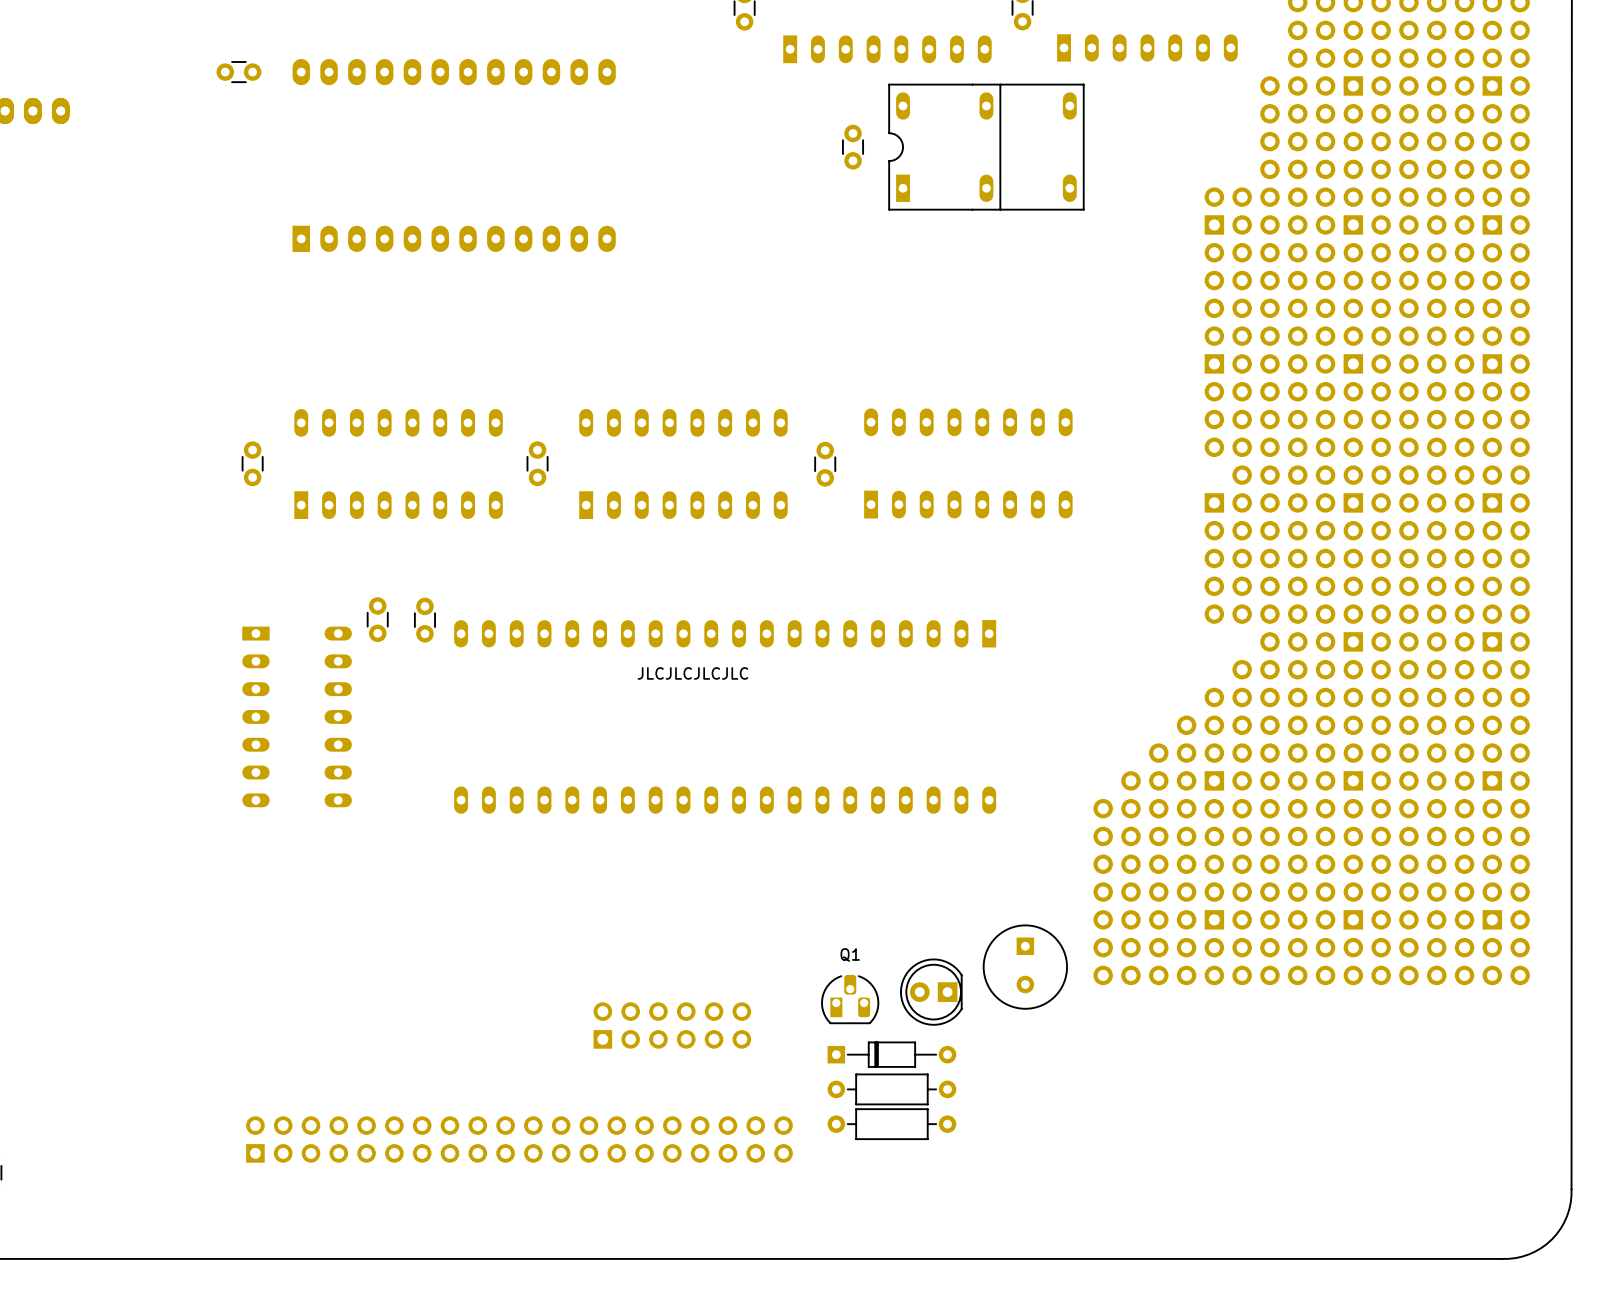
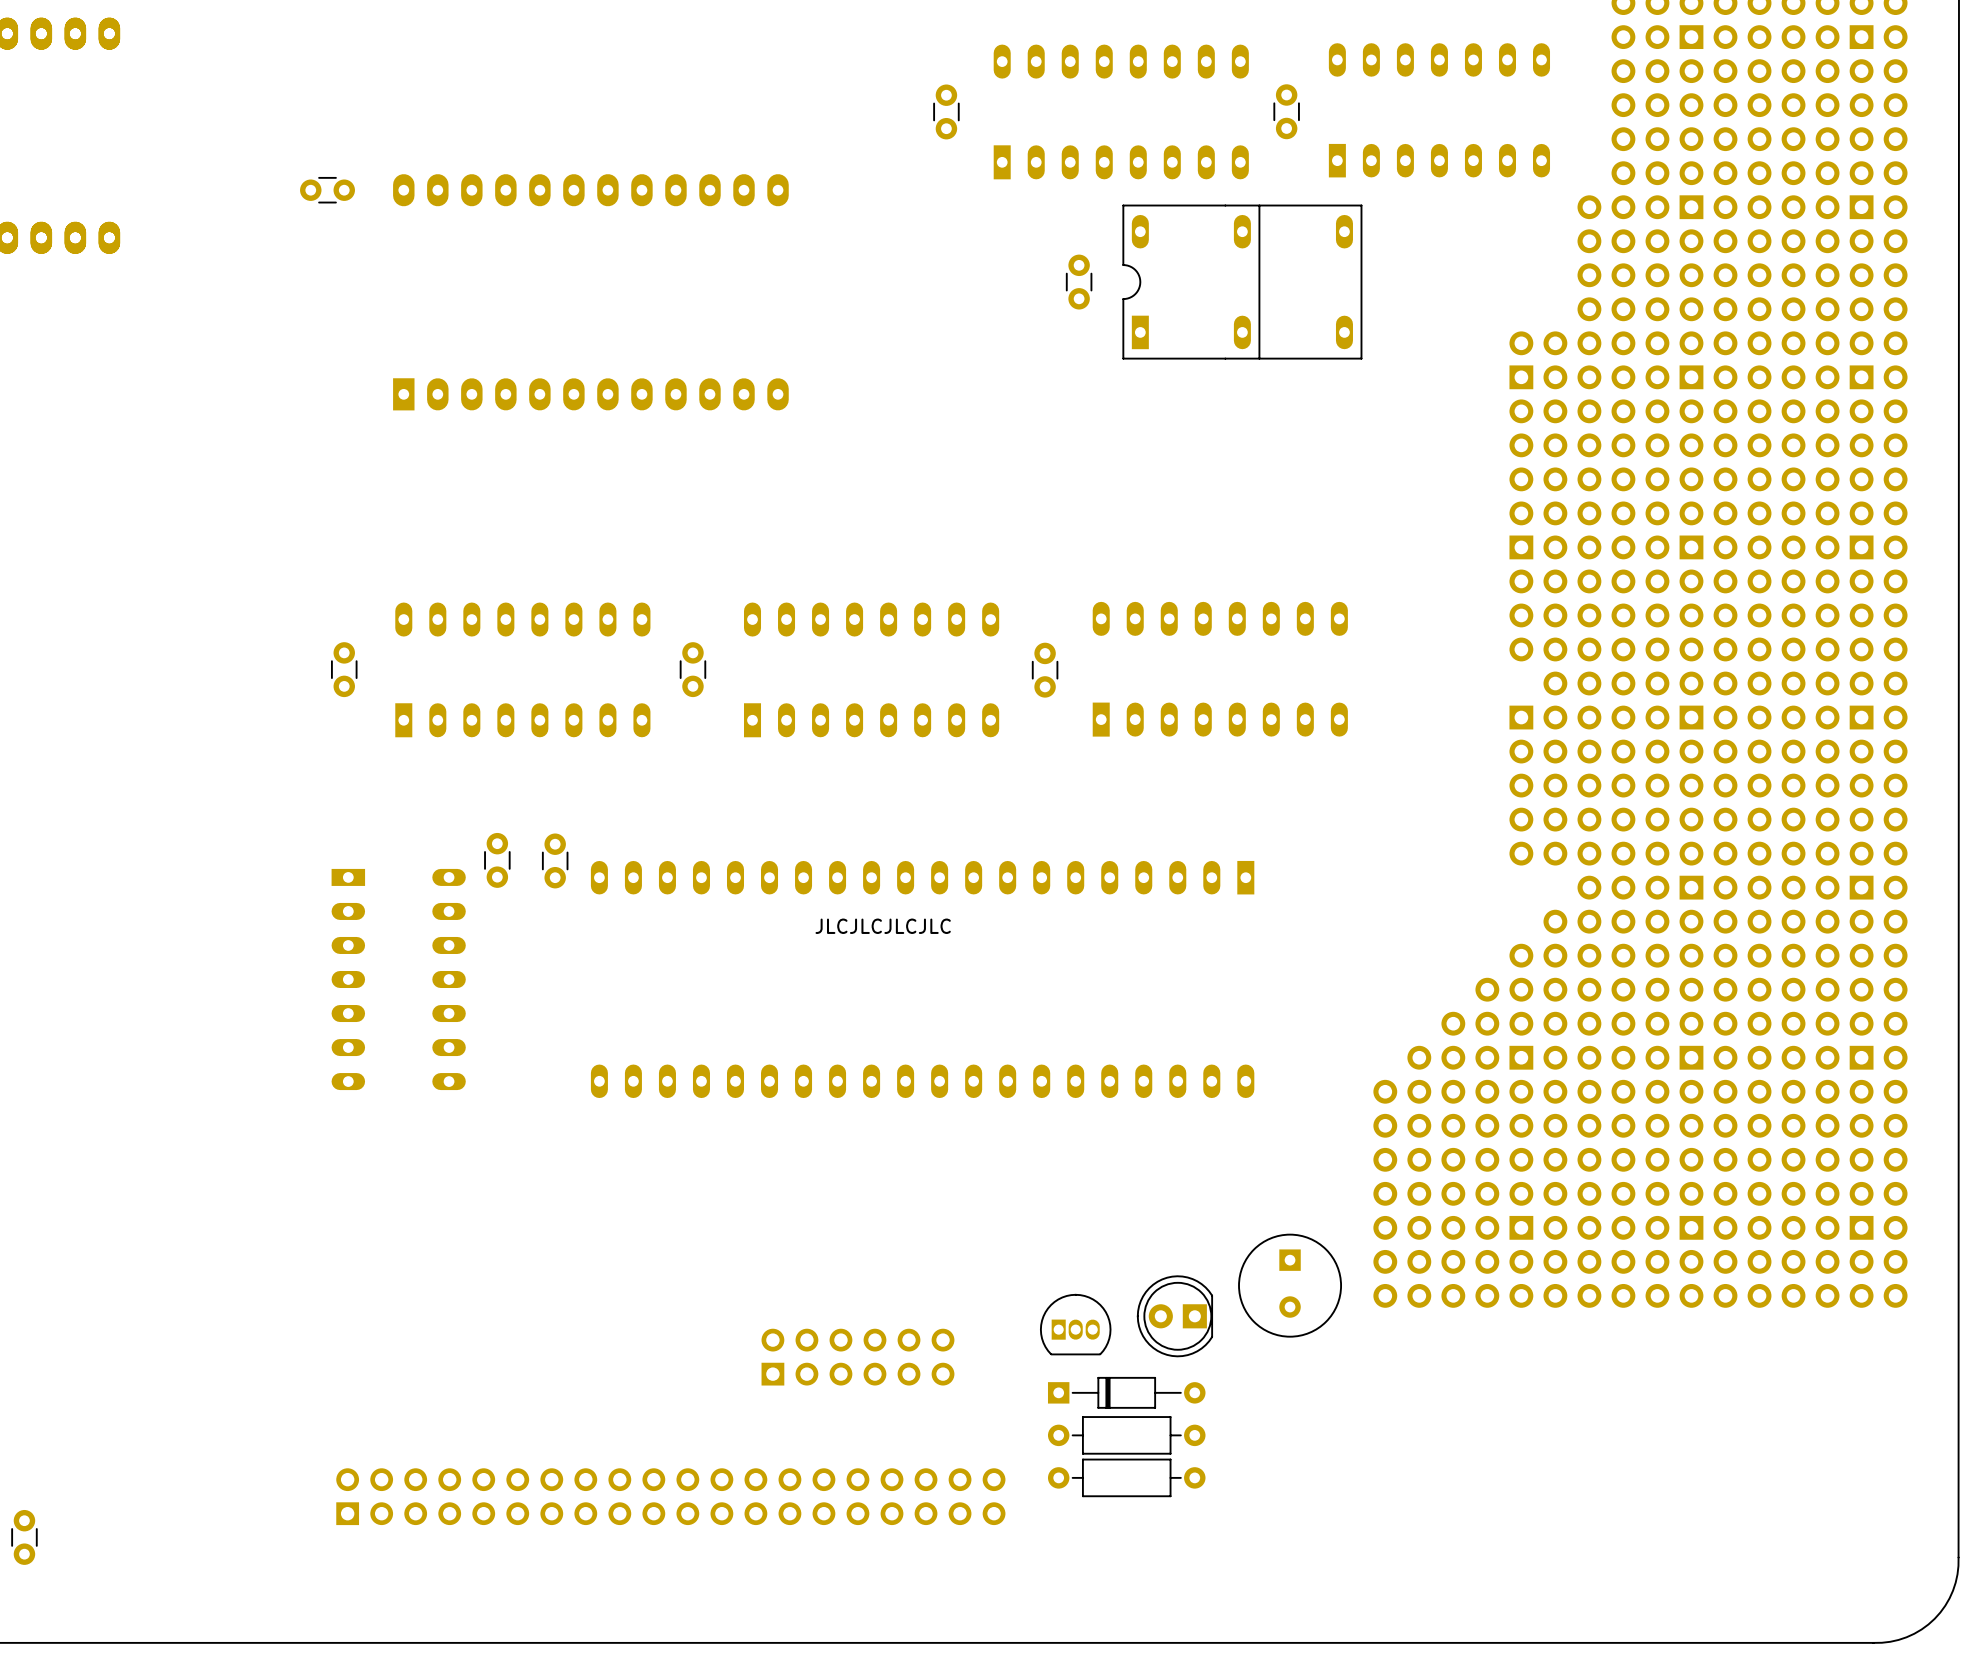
part: none -> (1075, 1324)
Q1: (850, 999) -> none

